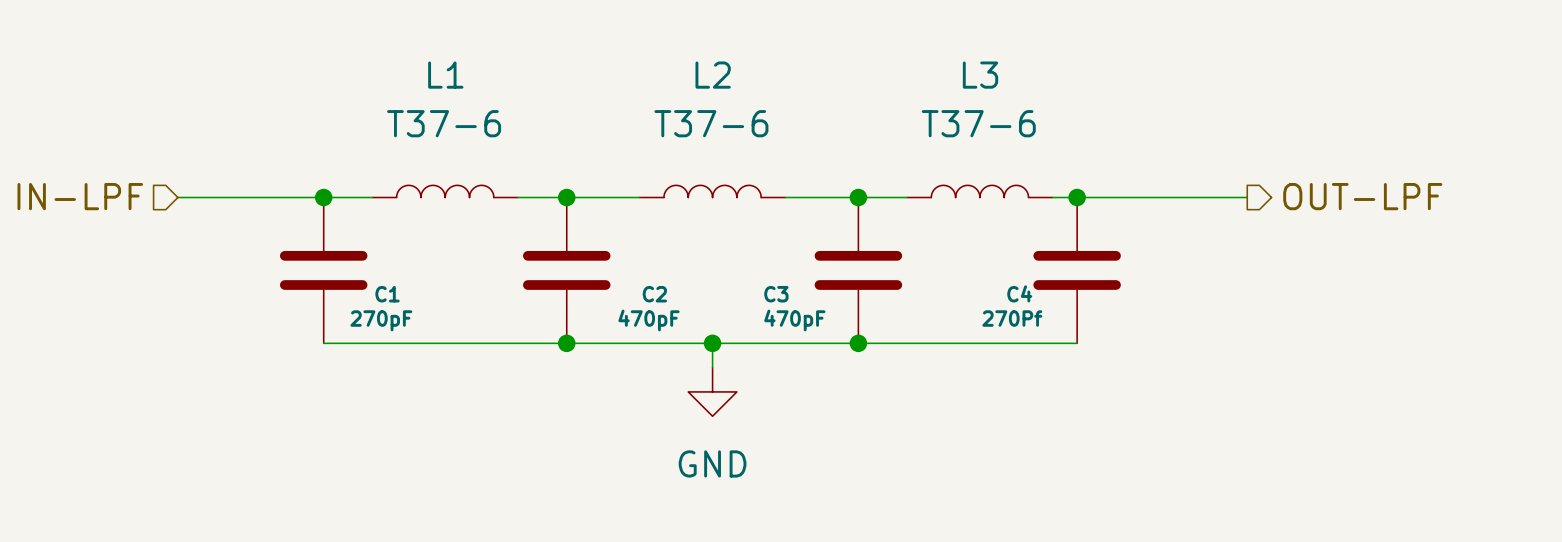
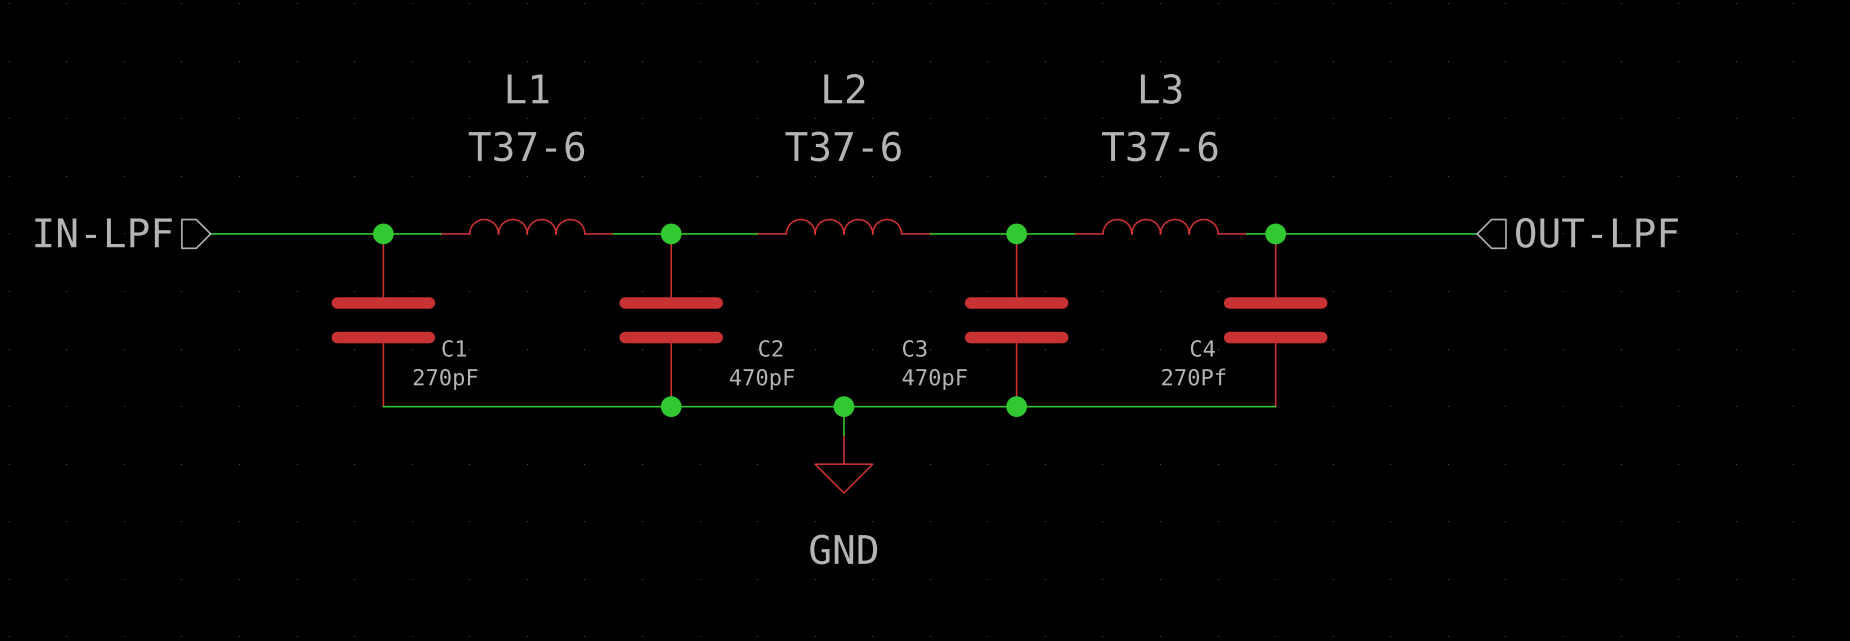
hierarchical label shape: output (1362, 196) -> input (1596, 232)

